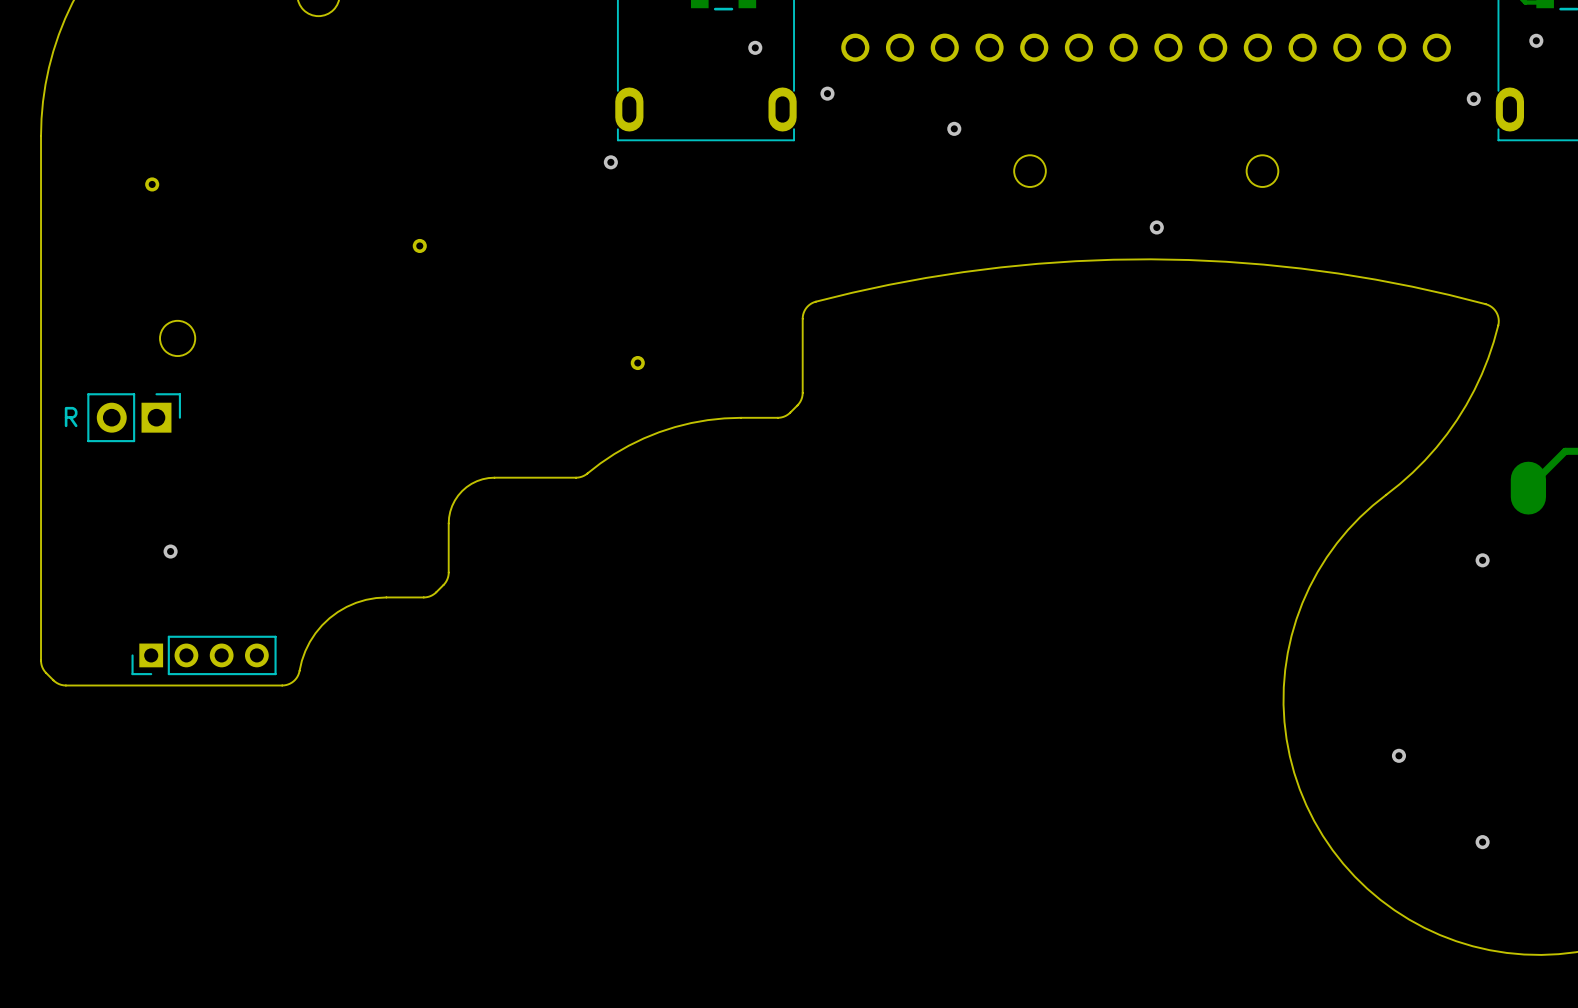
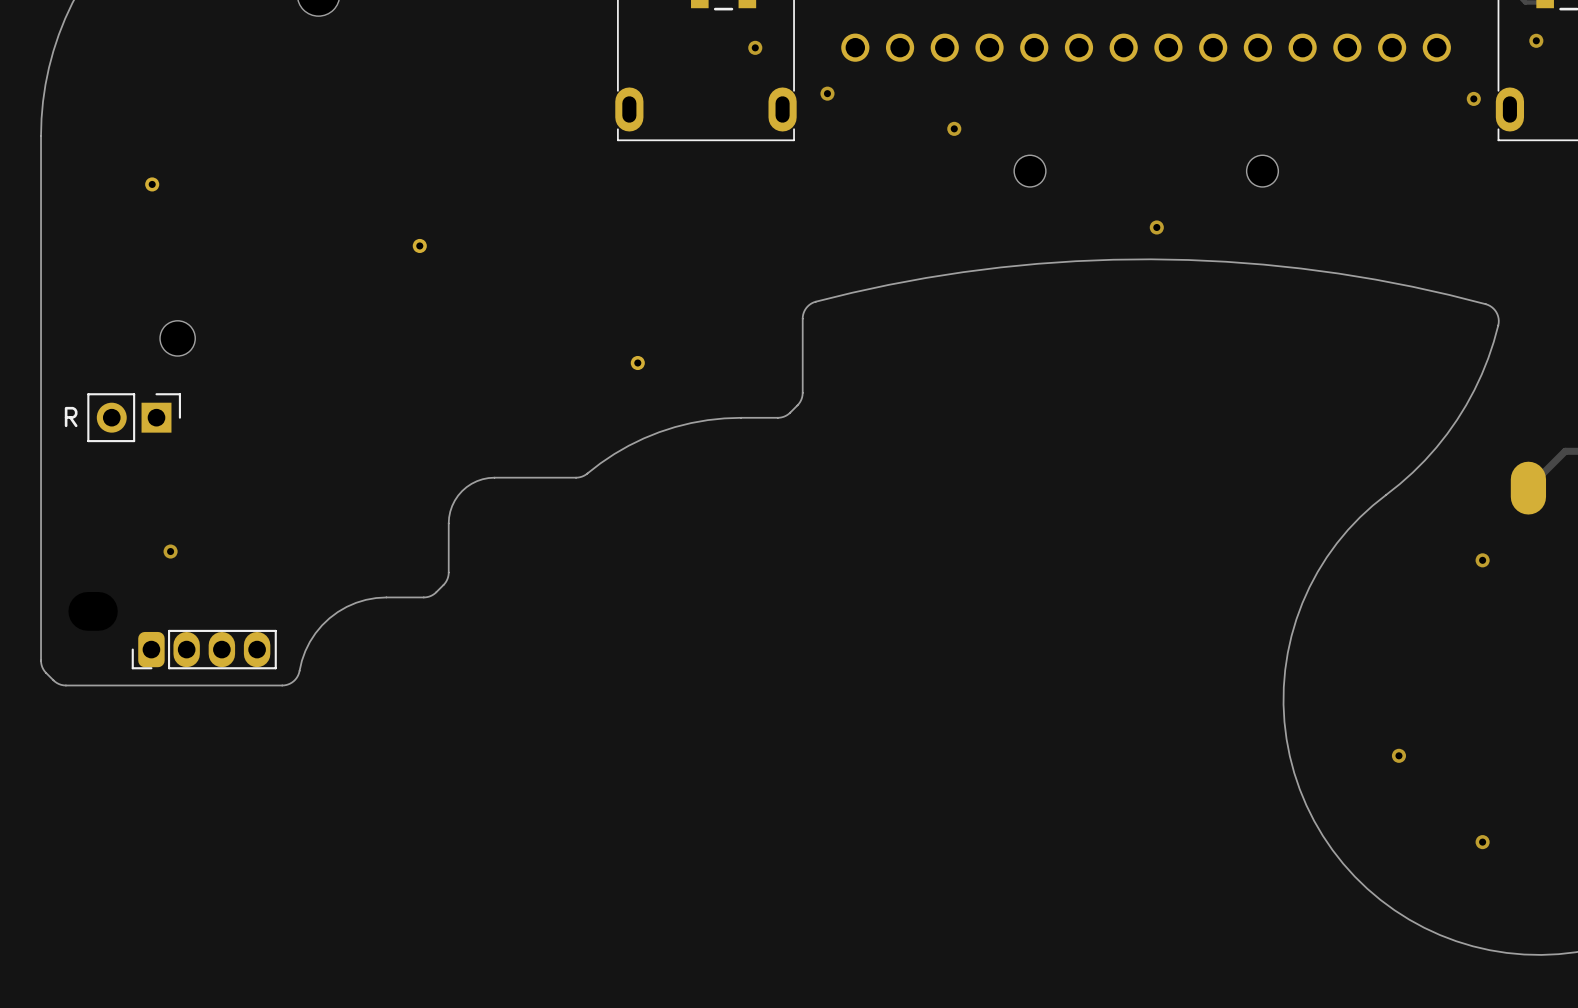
via: (610, 162) -> none
part footprint: [131, 635, 277, 676] -> [131, 629, 277, 670]

